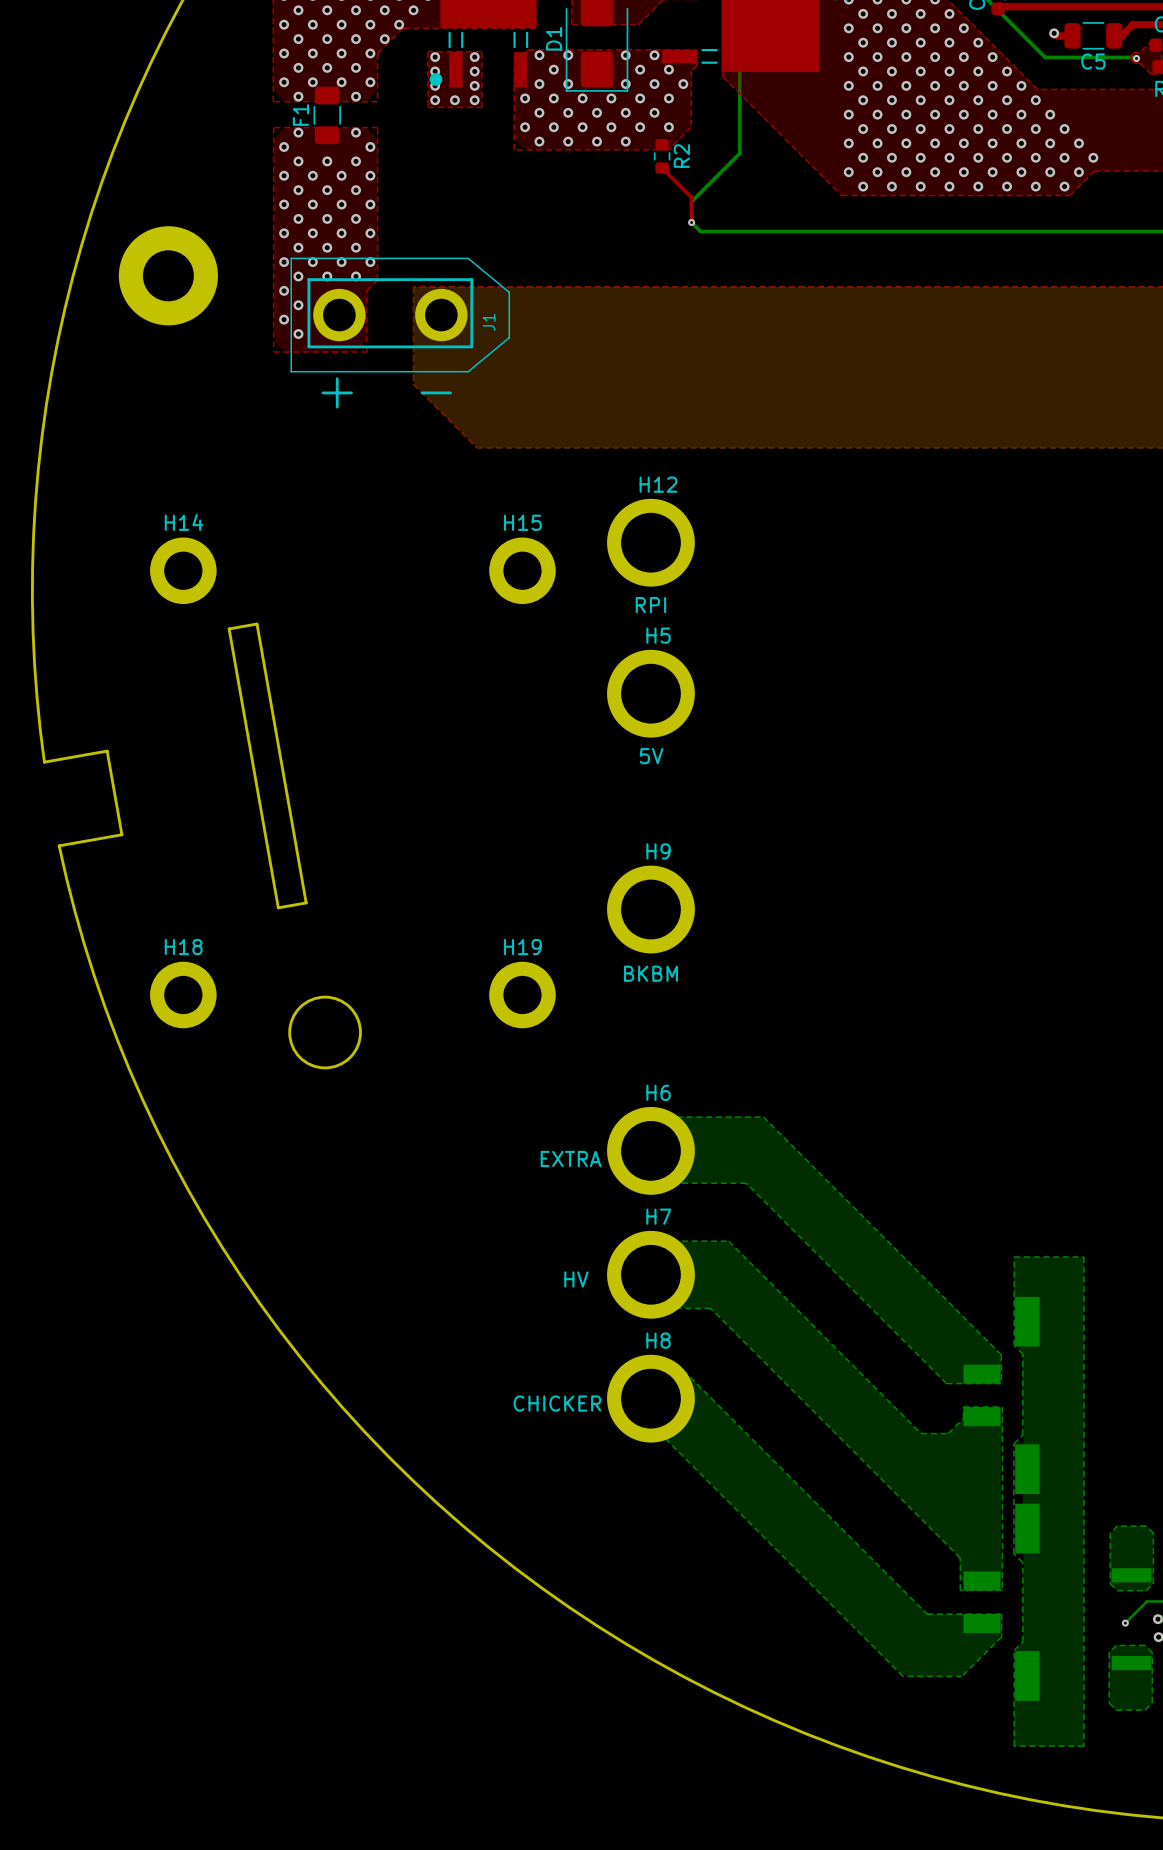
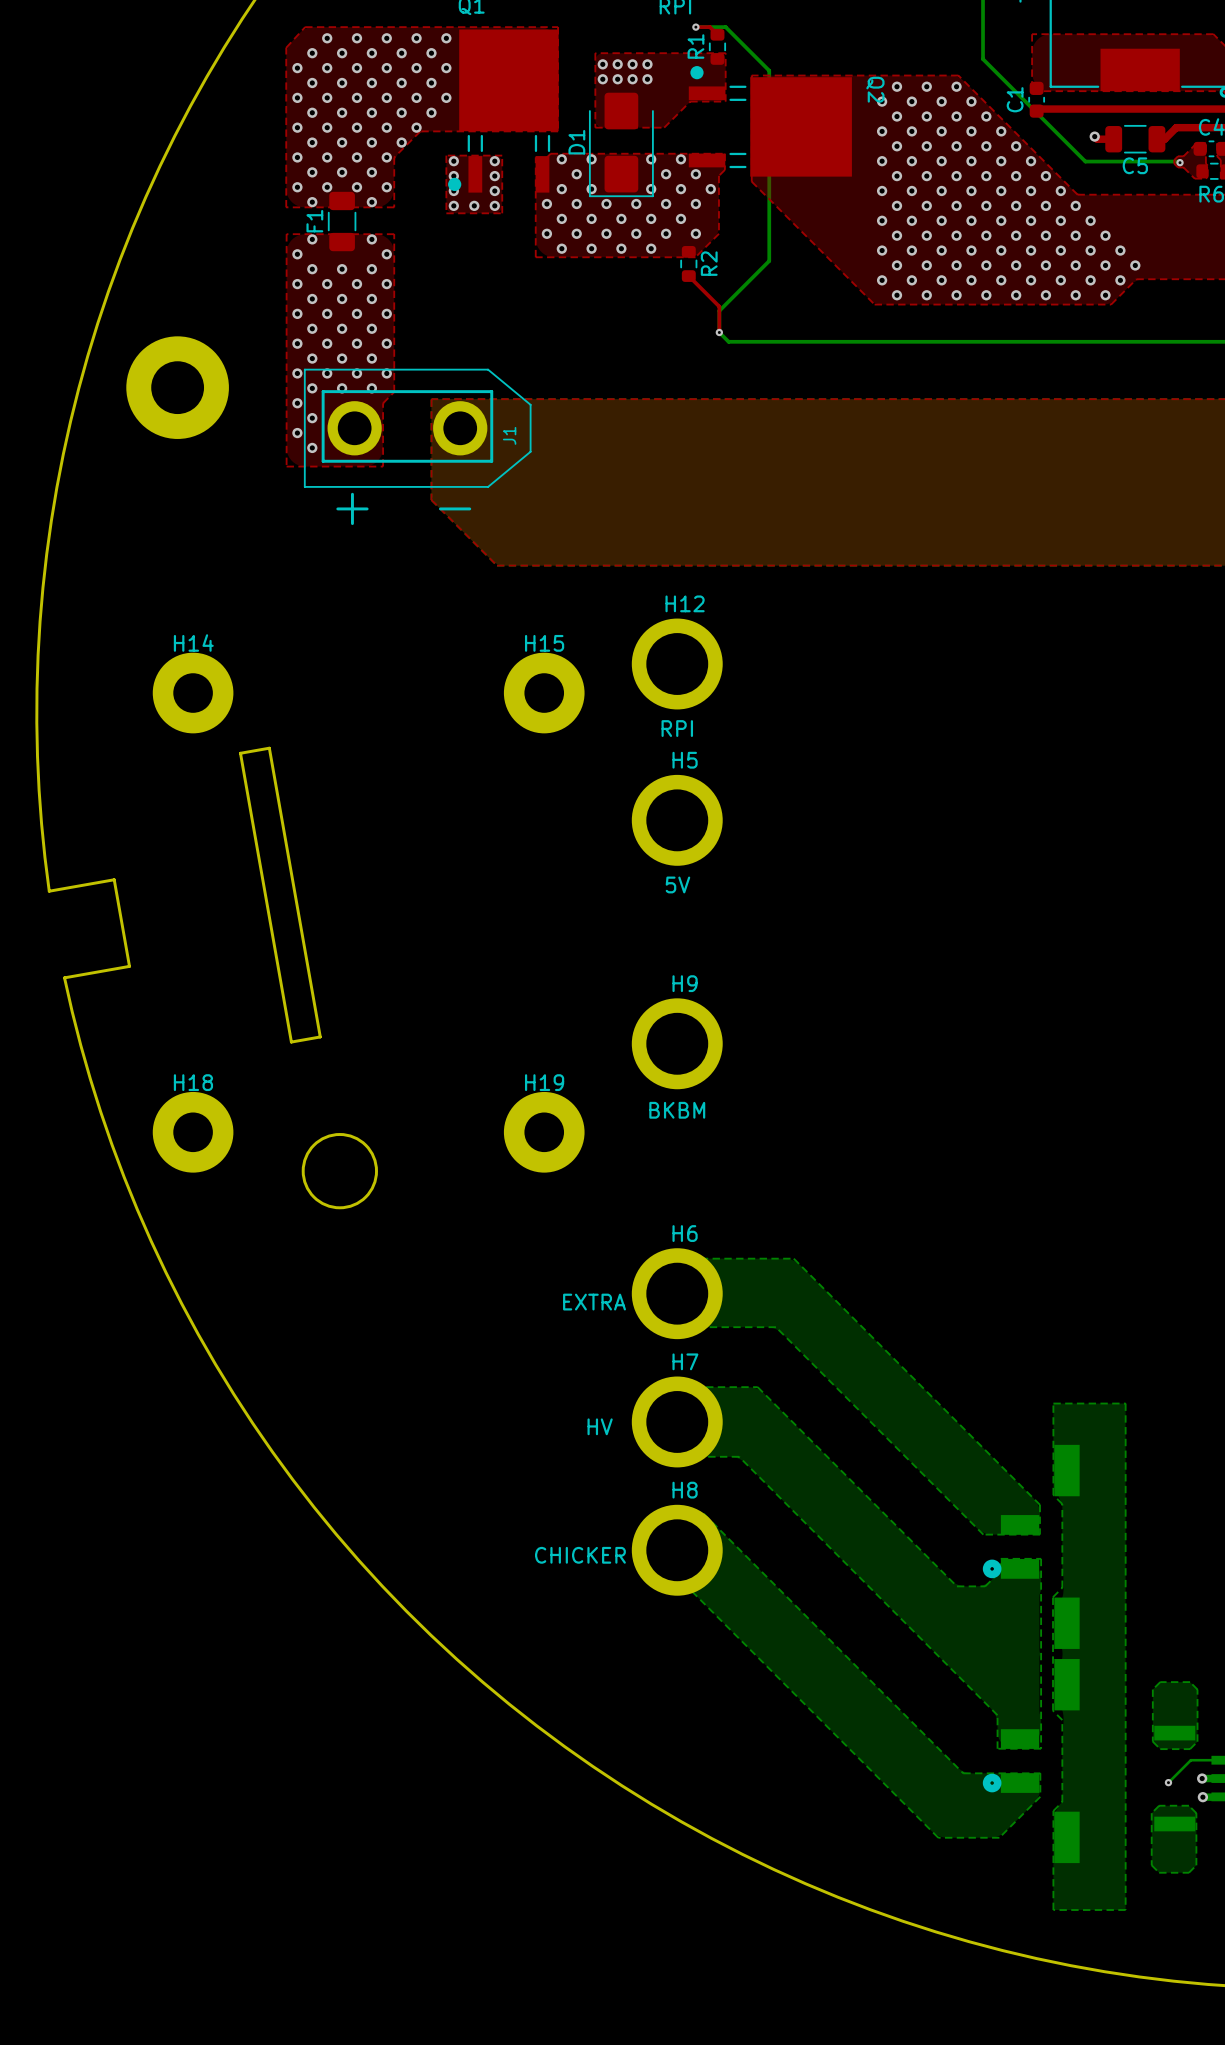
H14 footprint: [150, 537, 217, 605] -> [152, 652, 234, 734]
H15 footprint: [489, 537, 556, 605] -> [503, 652, 585, 734]
H18 footprint: [150, 961, 217, 1029] -> [152, 1091, 234, 1173]
H19 footprint: [489, 961, 556, 1029] -> [503, 1091, 585, 1173]
part footprint: [963, 1296, 1040, 1494] -> [982, 1444, 1080, 1649]
part footprint: [963, 1503, 1040, 1701] -> [982, 1659, 1080, 1864]

